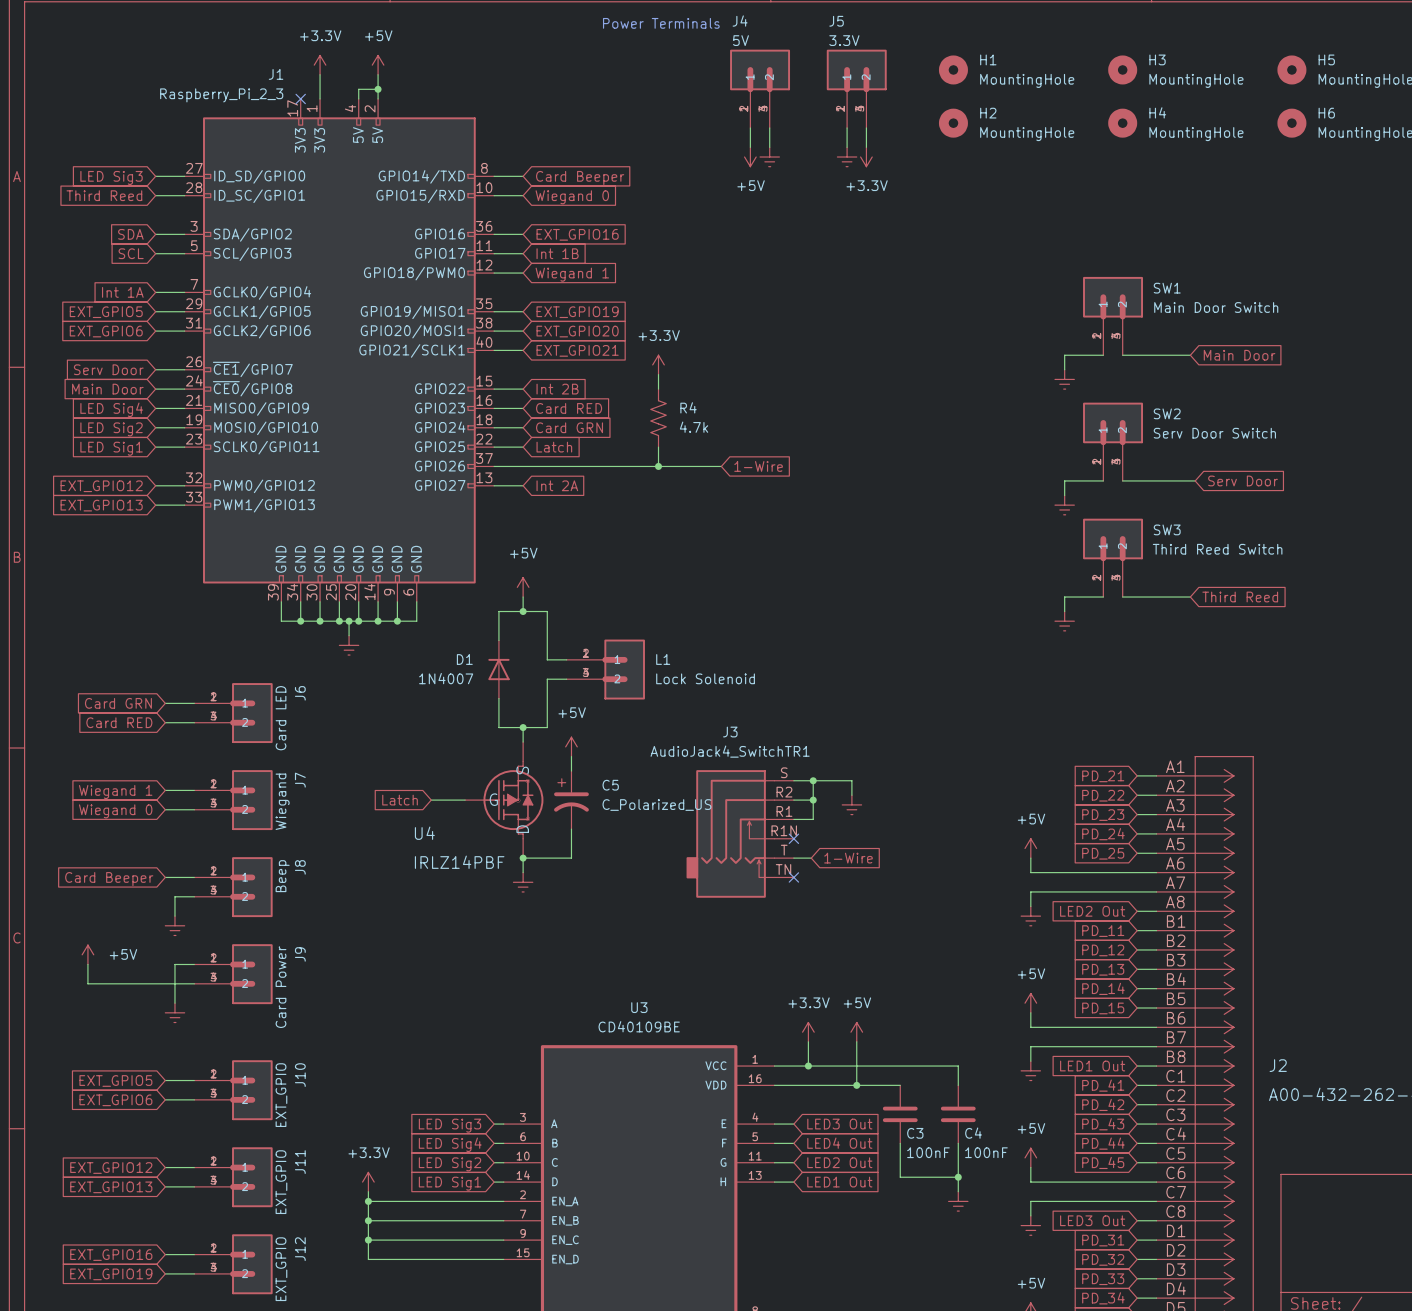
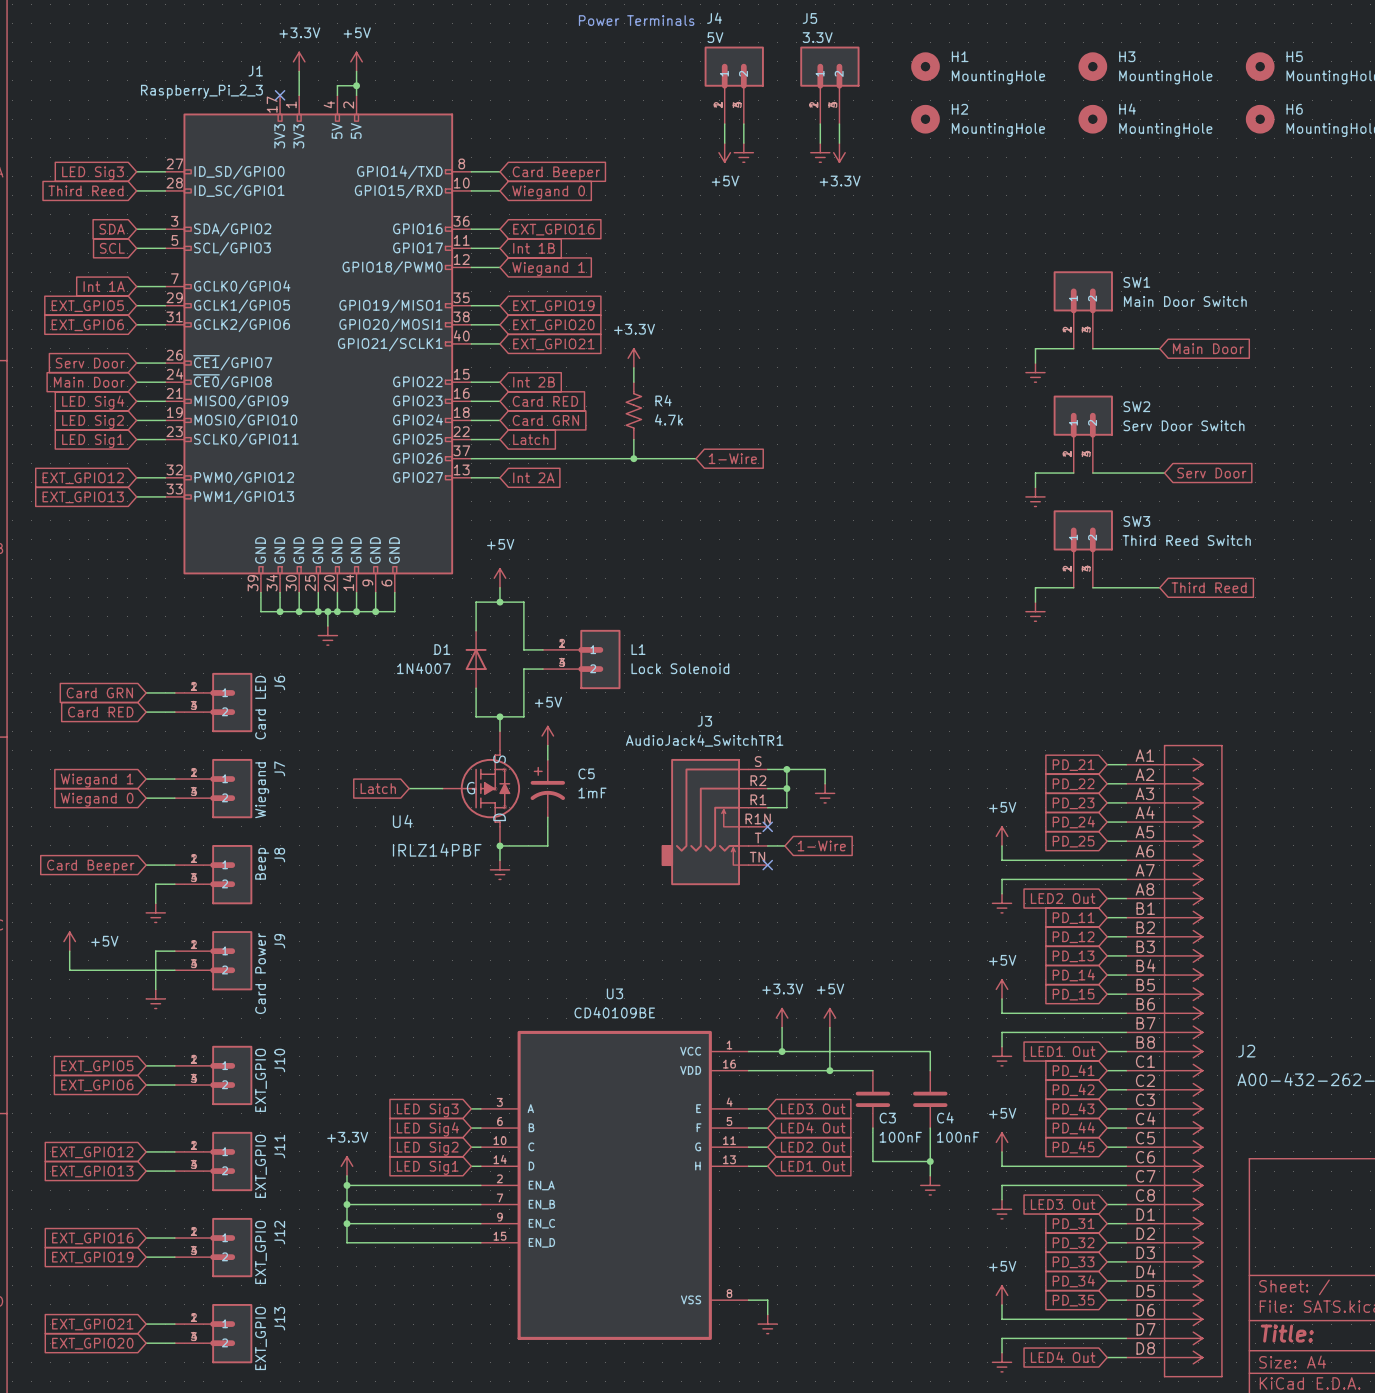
C5 value: C_Polarized_US (656, 805) -> 1mF (592, 793)

